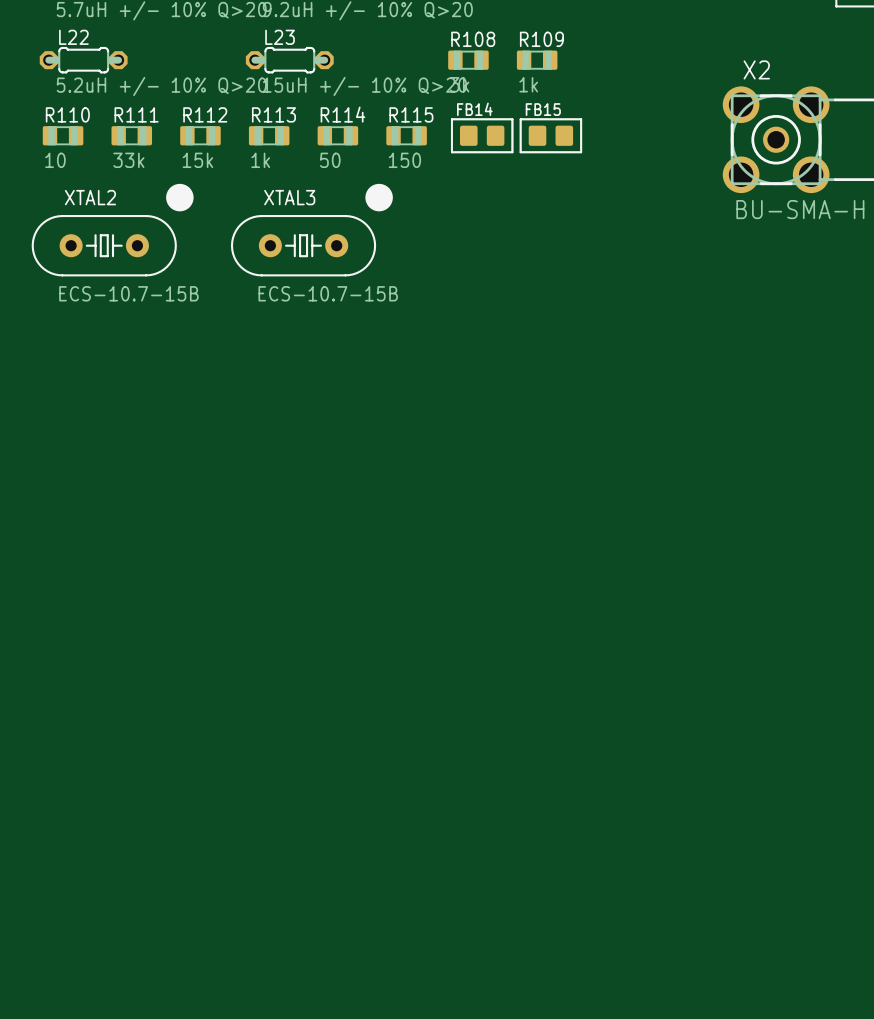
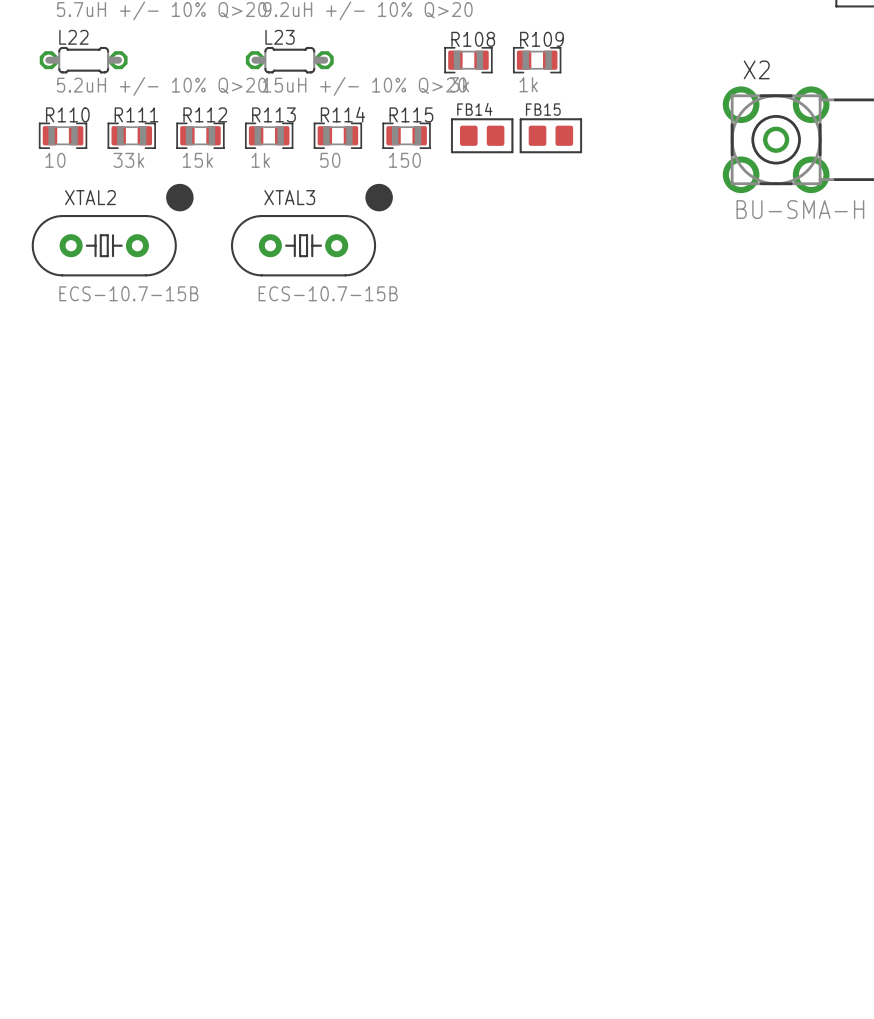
R108 footprint: [448, 50, 489, 70] -> [444, 46, 493, 74]
R109 footprint: [516, 50, 558, 70] -> [512, 46, 562, 74]
R110 footprint: [42, 126, 84, 146] -> [38, 122, 88, 149]
R111 footprint: [111, 126, 153, 146] -> [107, 122, 156, 149]
R112 footprint: [180, 126, 221, 146] -> [176, 122, 225, 149]
R113 footprint: [248, 126, 290, 146] -> [244, 122, 294, 149]
R114 footprint: [317, 126, 359, 146] -> [313, 122, 363, 149]
R115 footprint: [386, 126, 427, 146] -> [382, 122, 431, 149]

